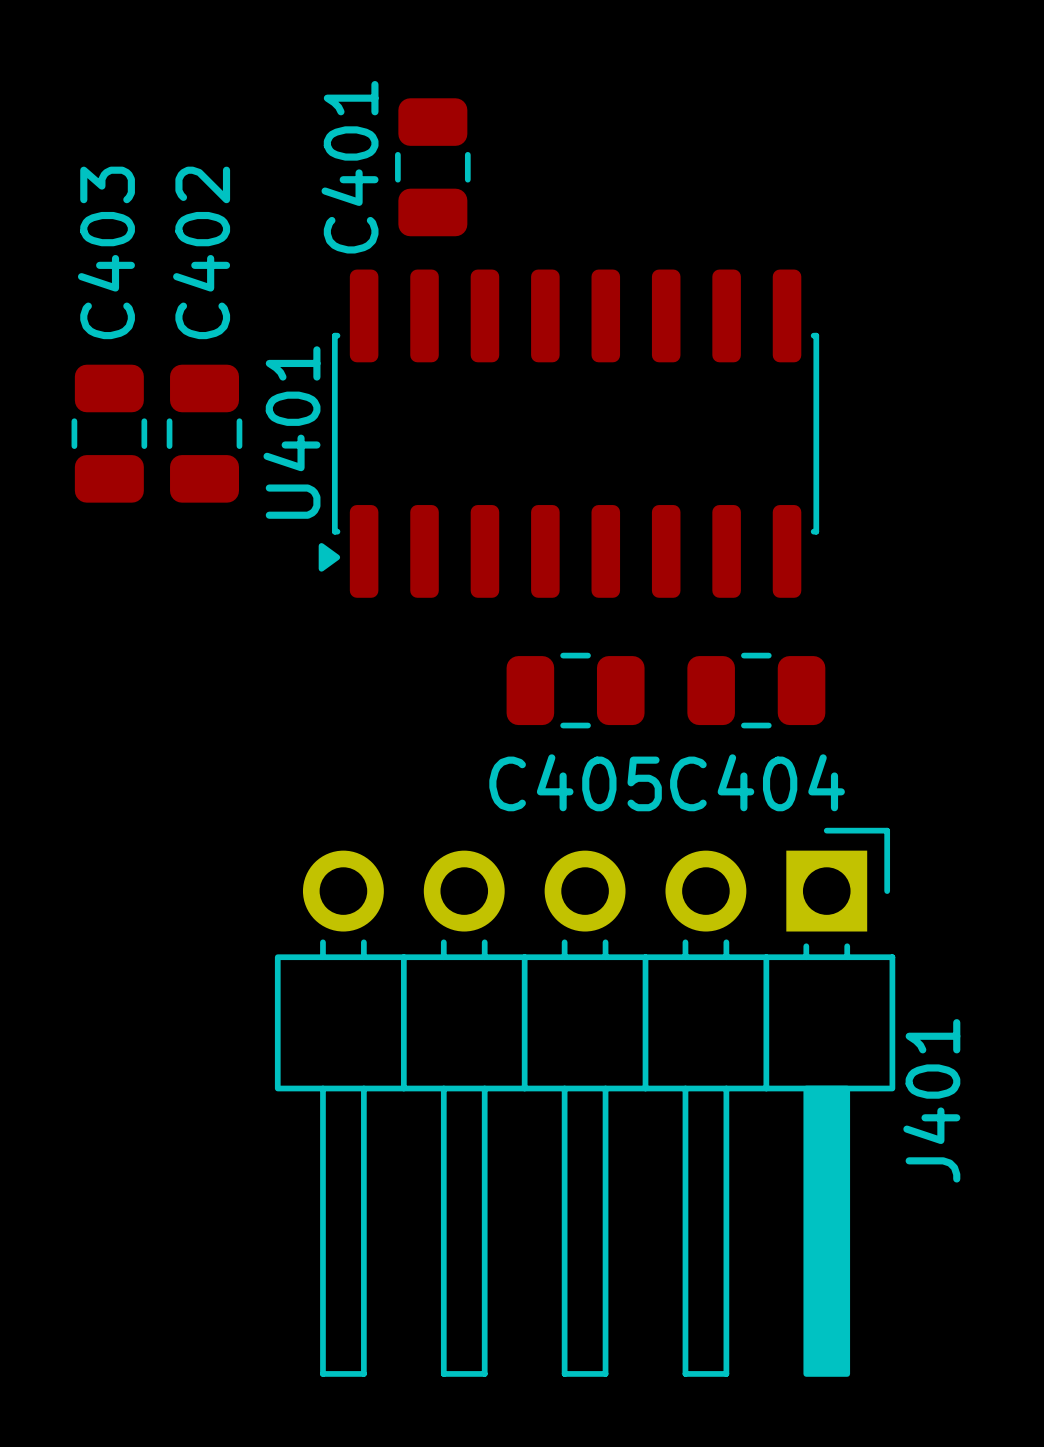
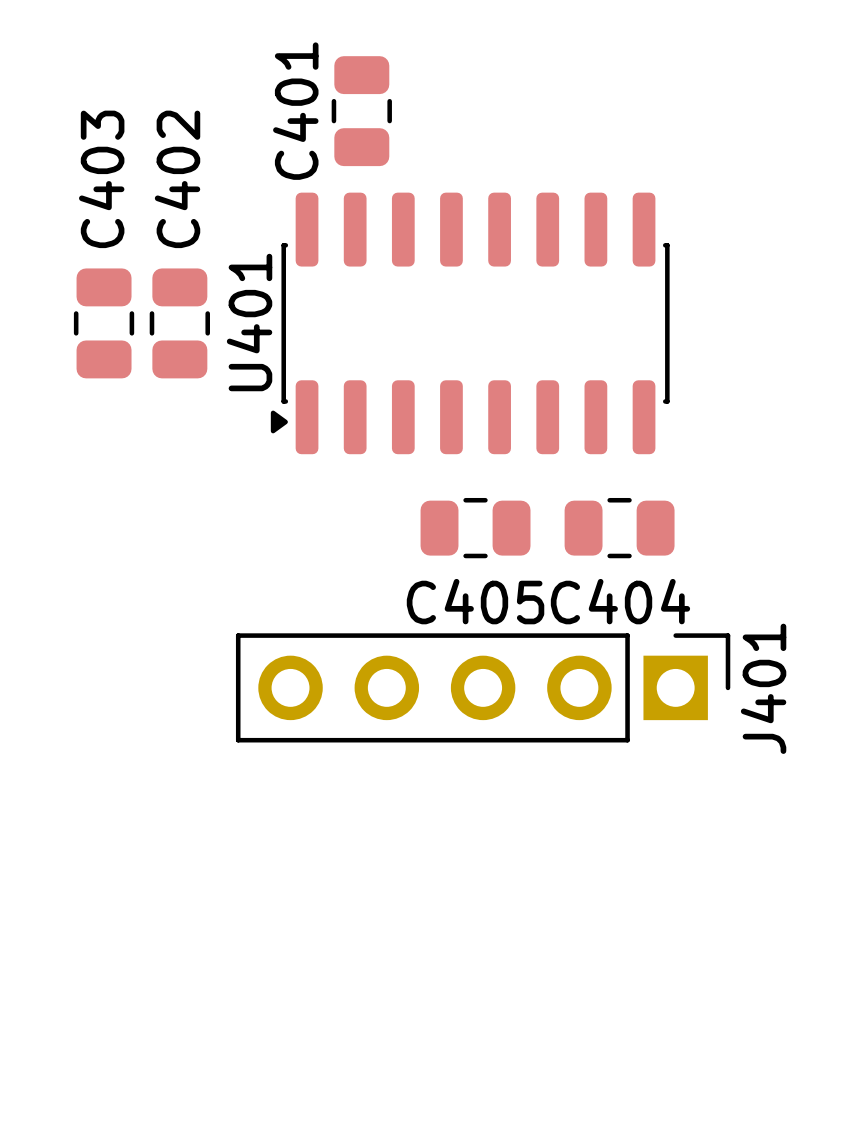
J401 footprint: [274, 827, 896, 1377] -> [235, 633, 731, 743]

